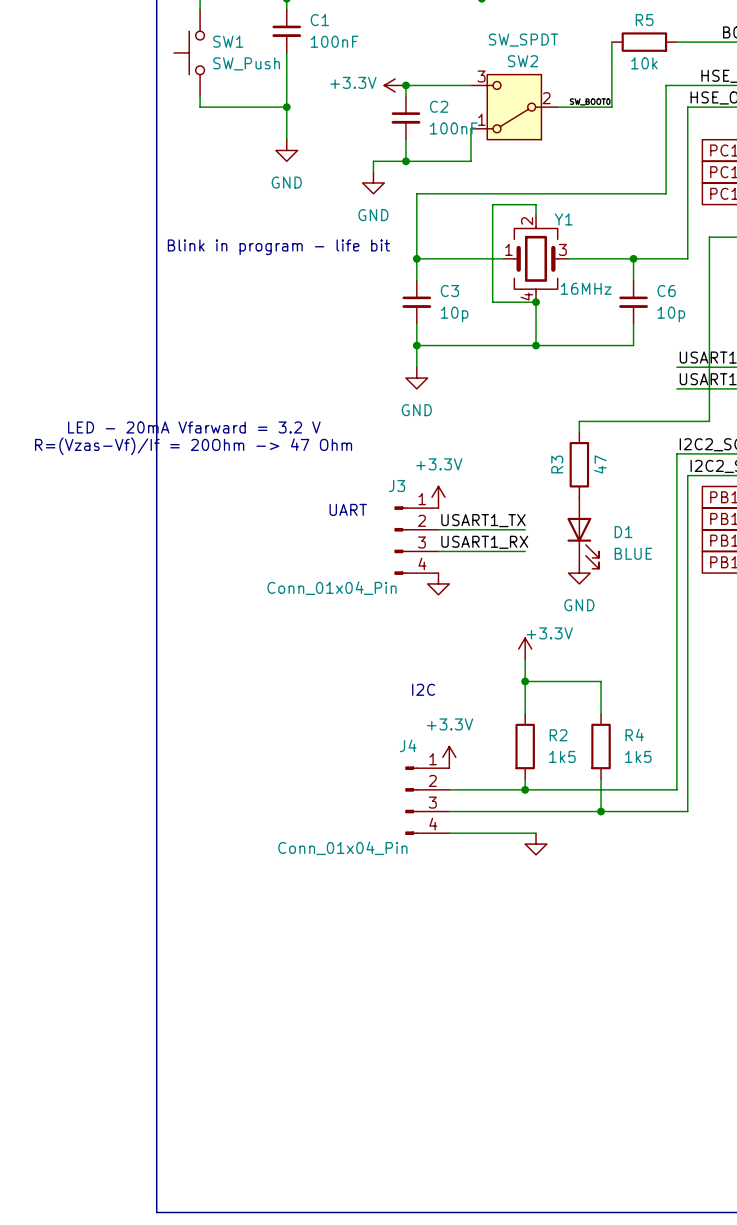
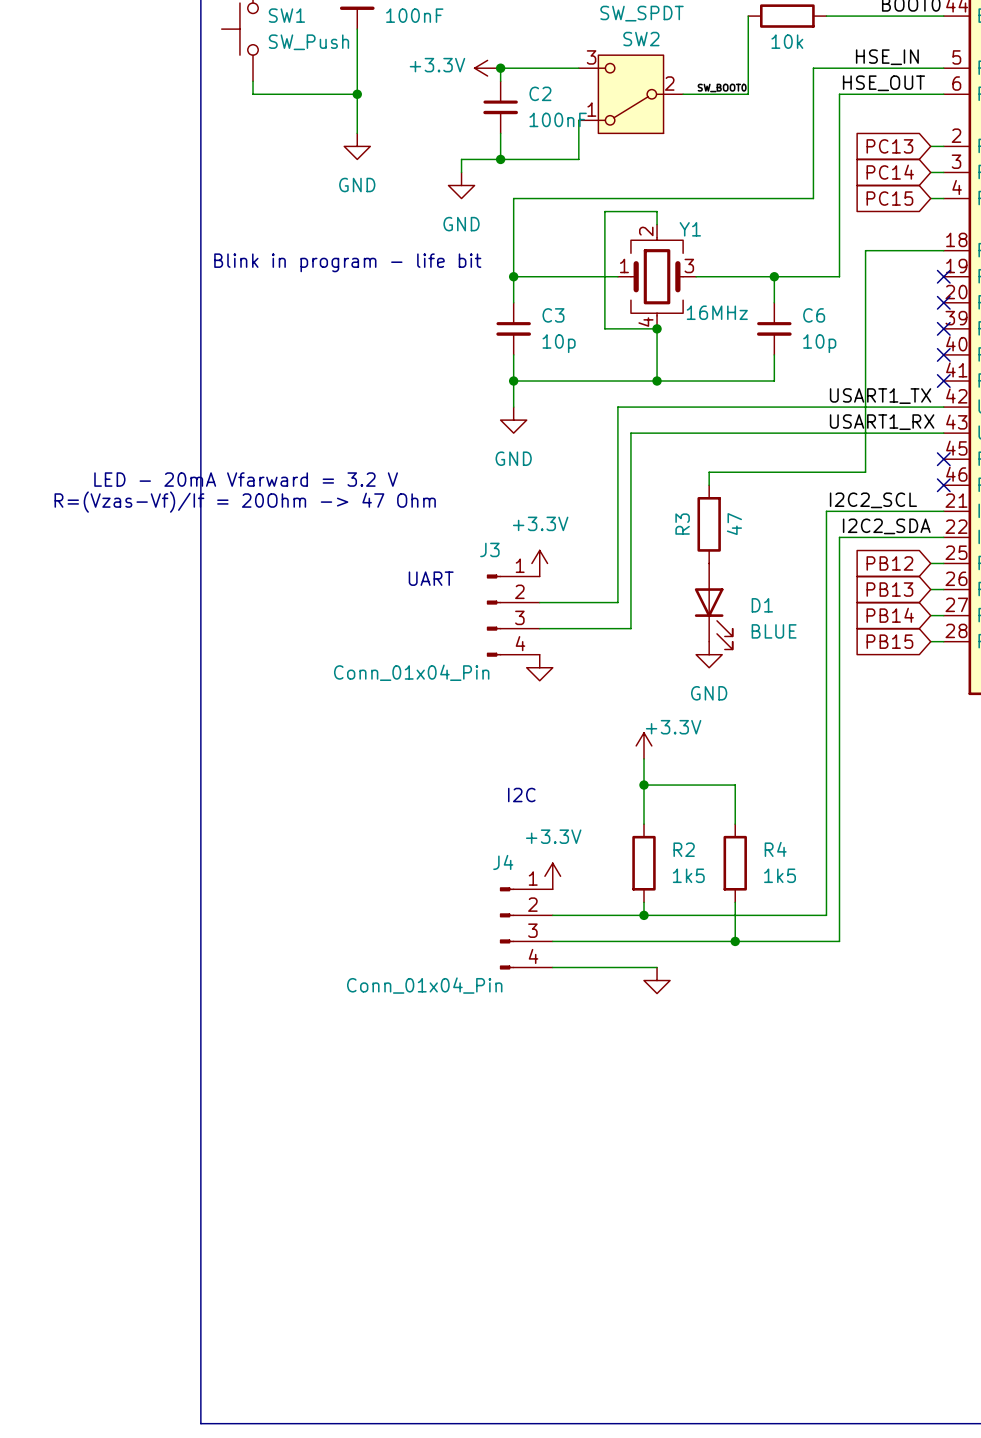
label: USART1_TX (483, 520) -> none
wire: (503, 529) (525, 529) -> (617, 602) (617, 407) (826, 407)
label: USART1_RX (484, 542) -> none
wire: (514, 551) (525, 551) -> (630, 628) (630, 433) (826, 433)

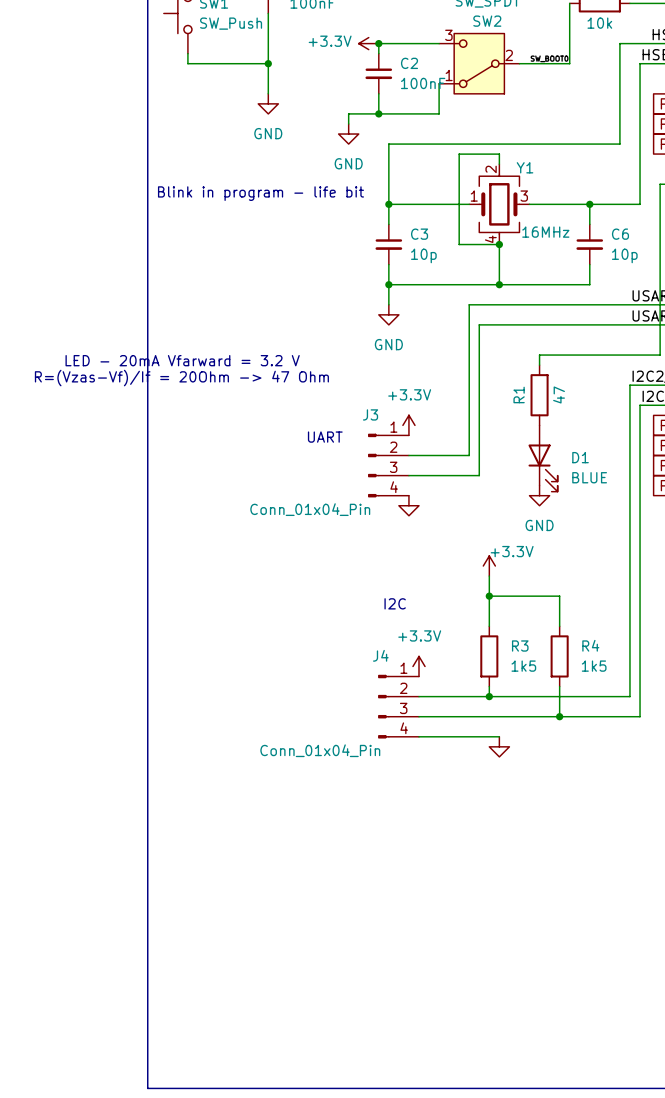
R3 name: R3 (682, 524) -> R1 (519, 394)
R2 name: R2 (684, 849) -> R3 (520, 646)

